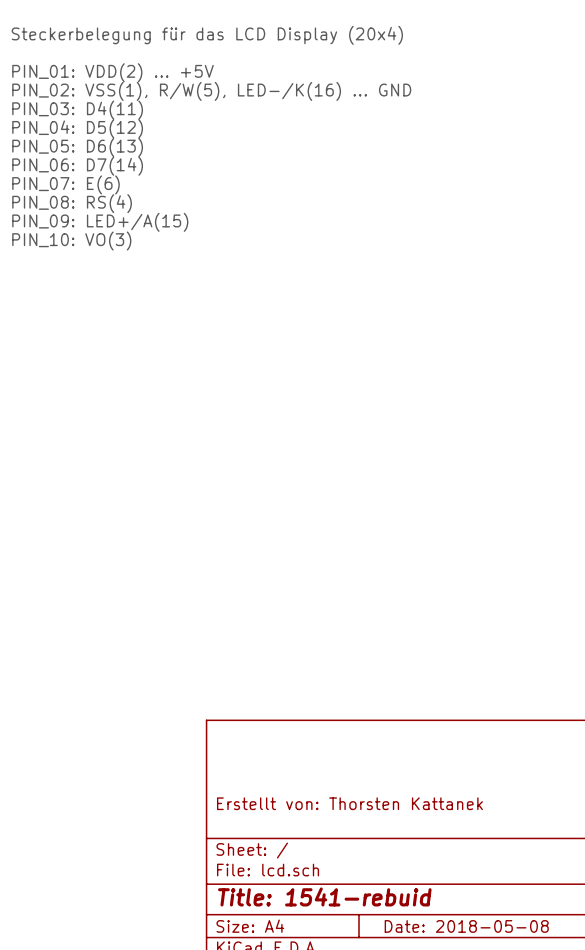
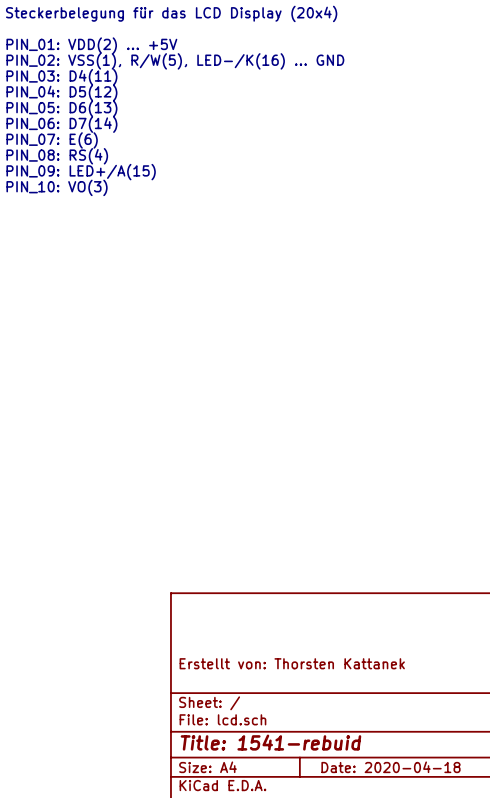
title block: Date: 2018-05-08 (466, 926) -> Date: 2020-04-18 (390, 767)

